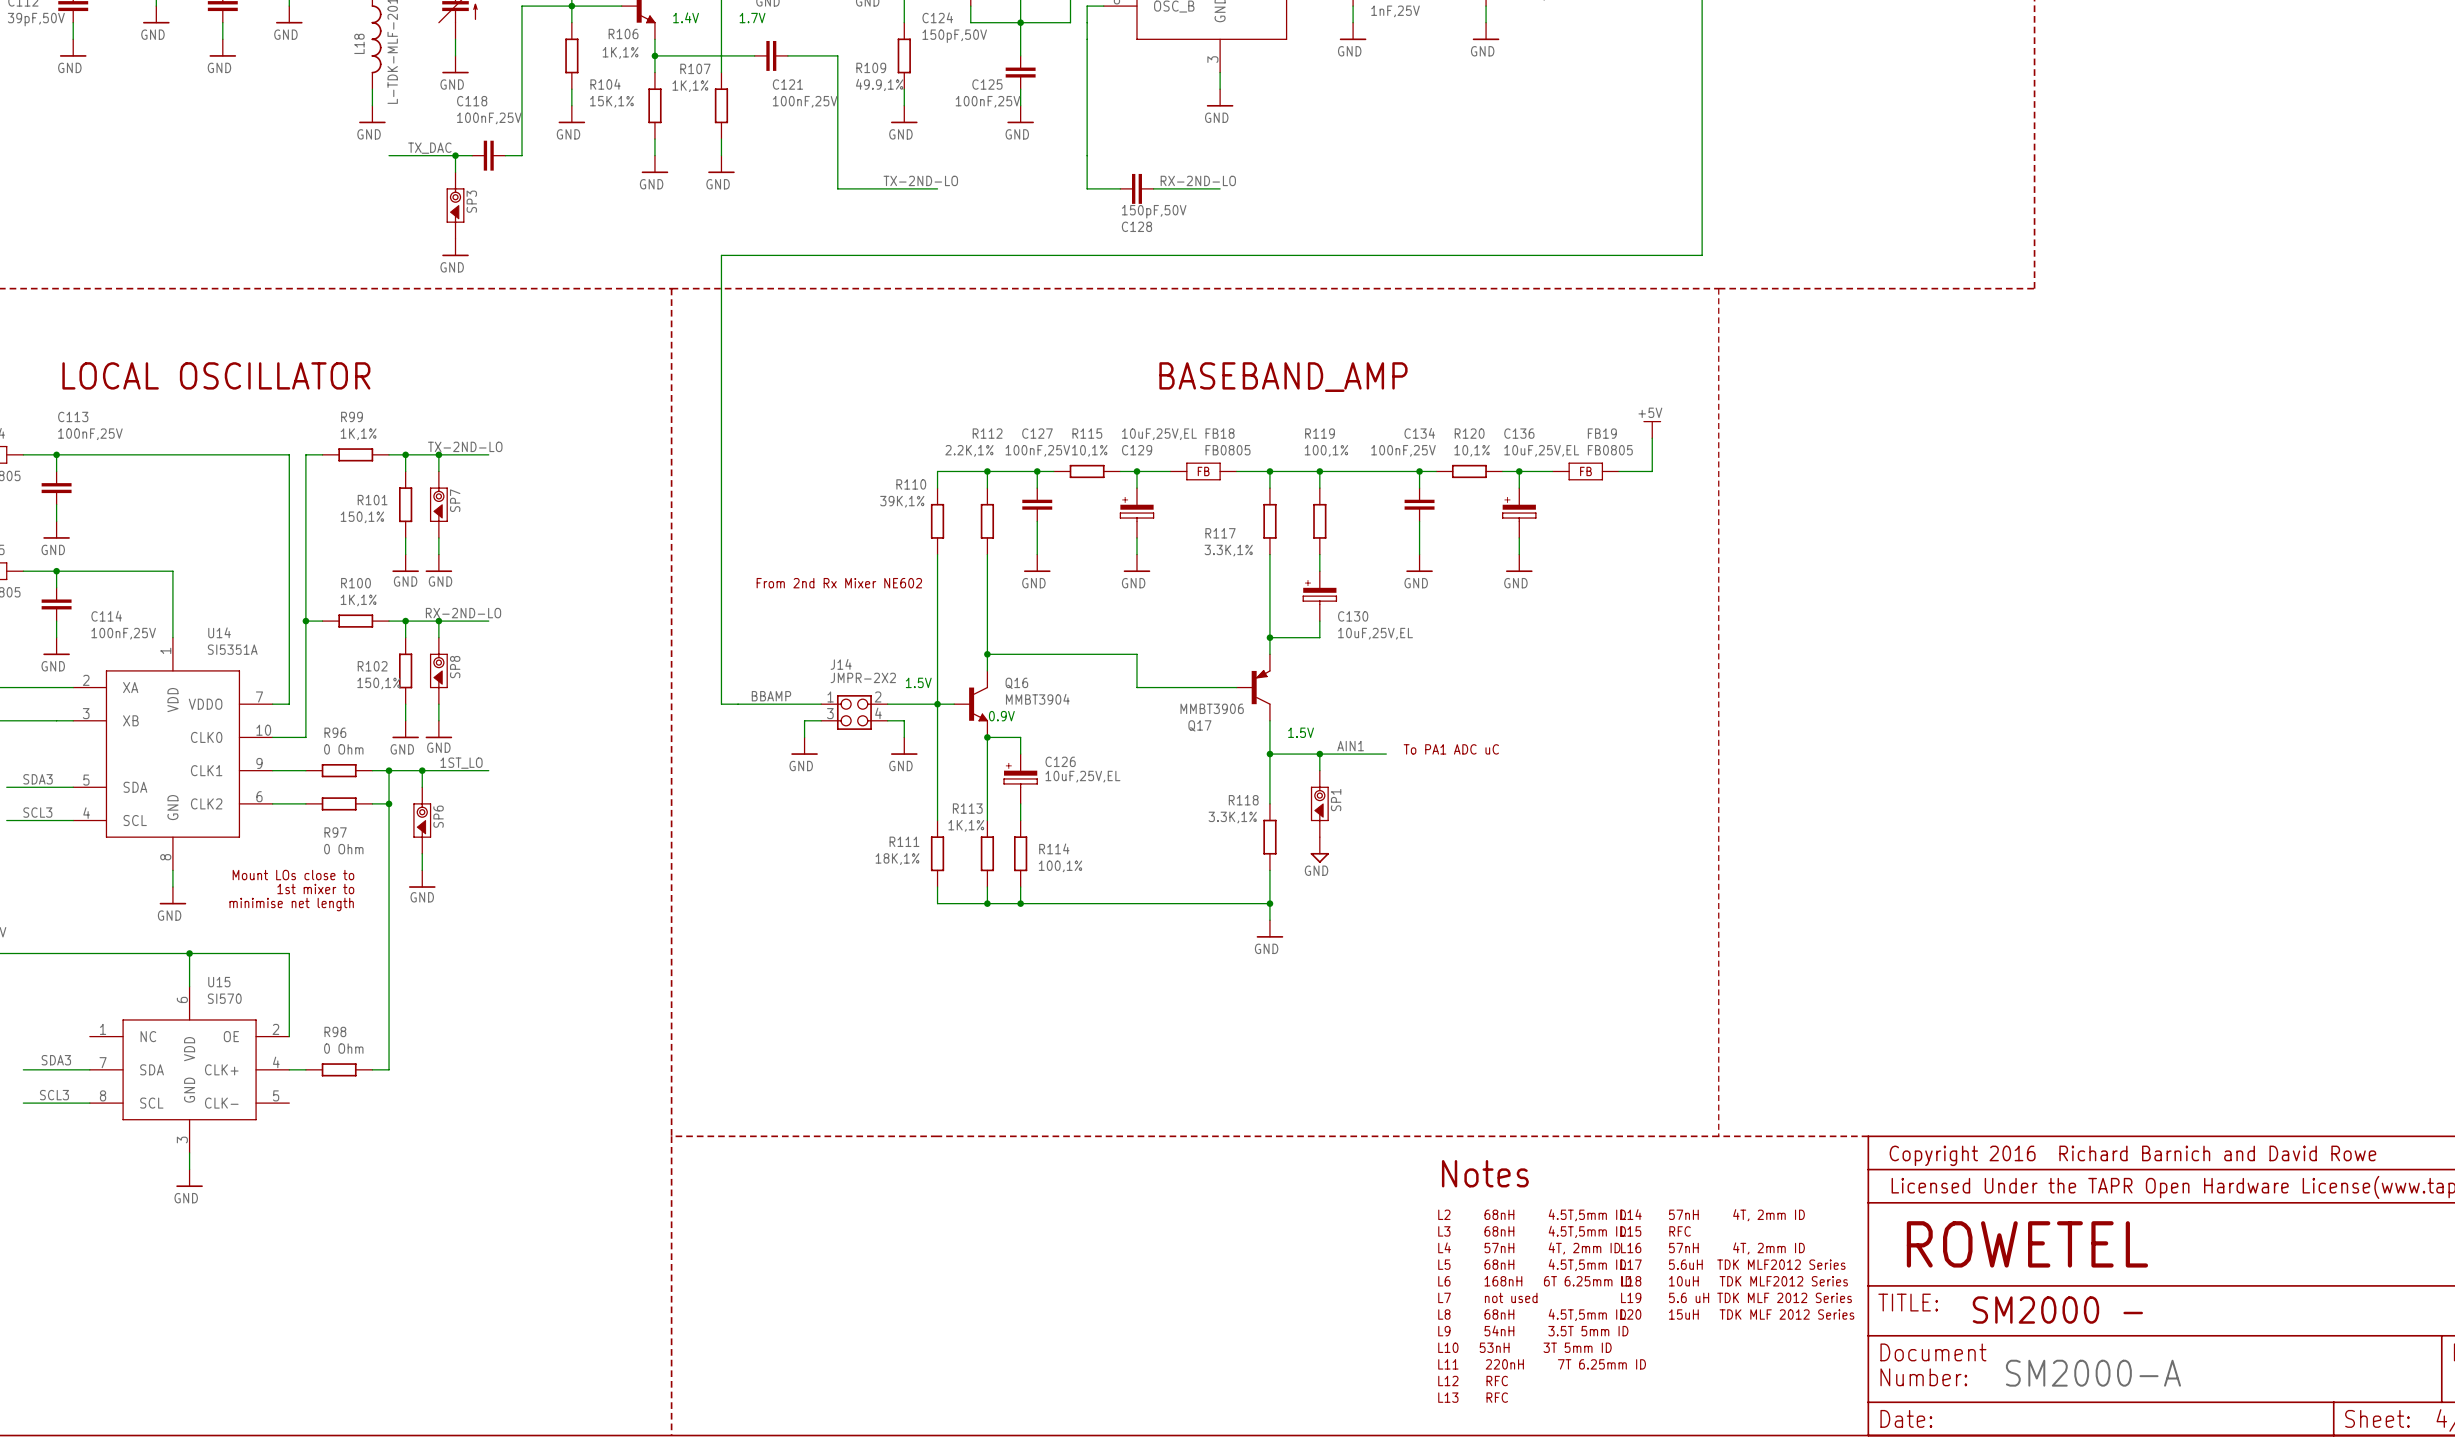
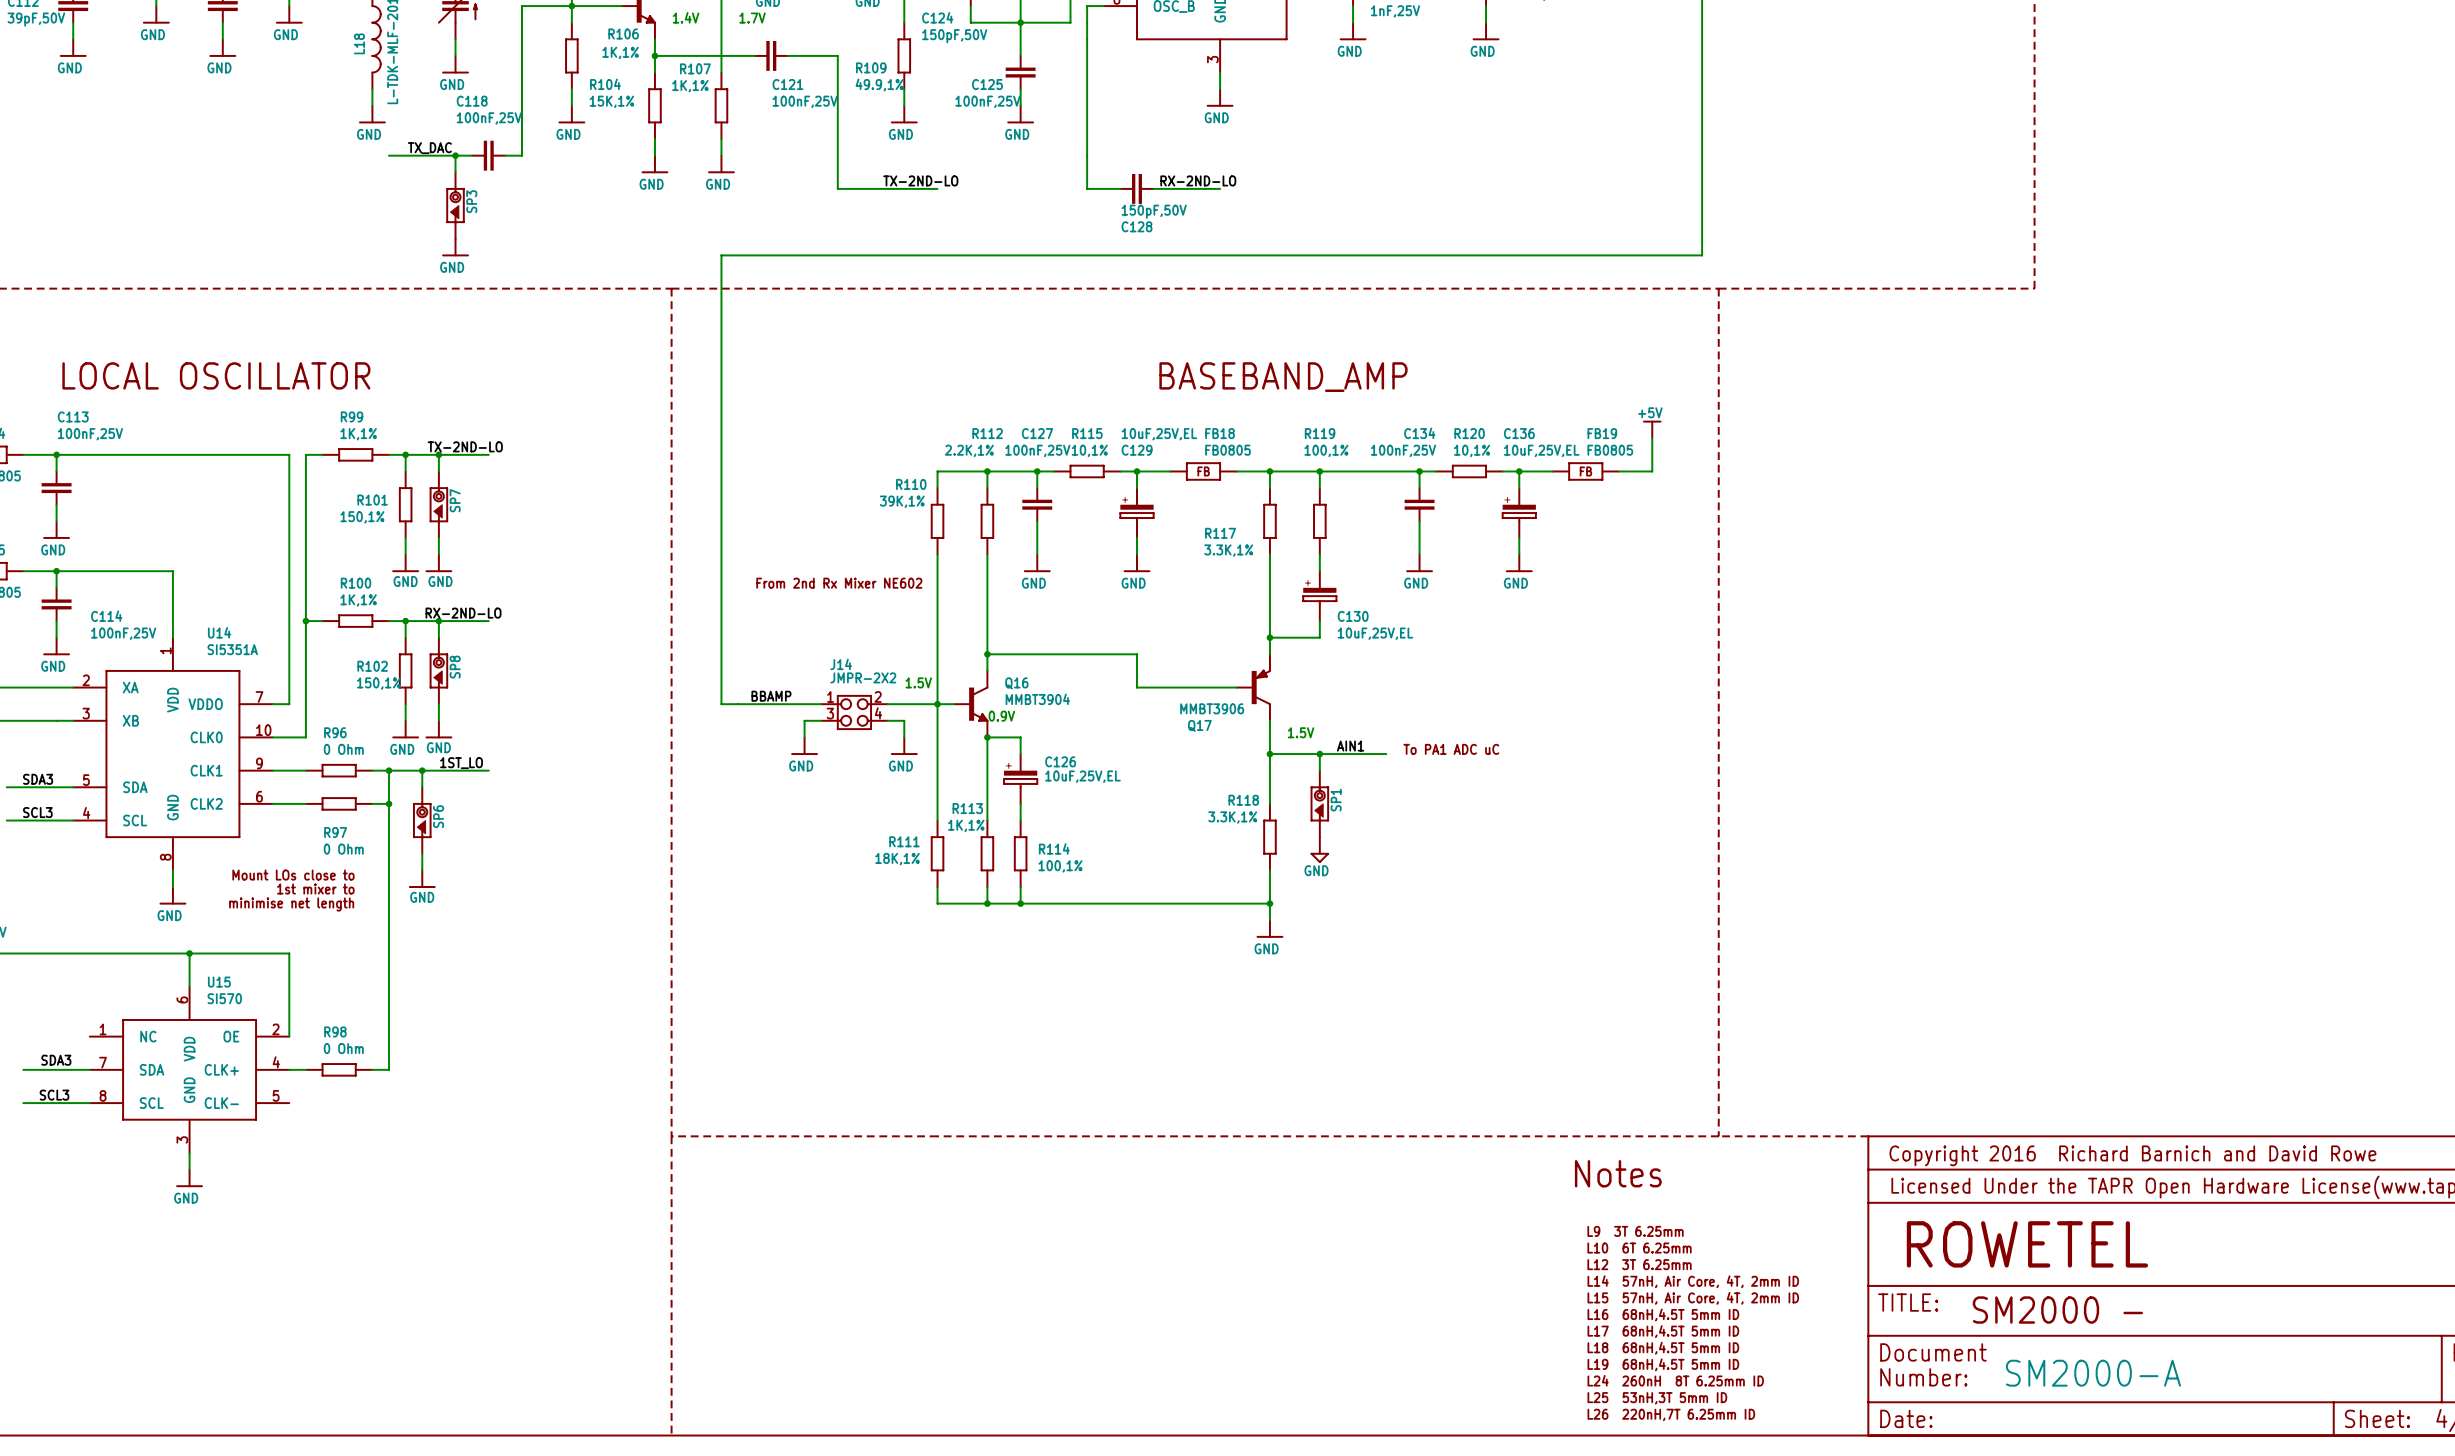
text position: Notes (1485, 1173) -> Notes (1618, 1173)
text: L2 68nH 4.5T,5mm ID (1532, 1215) -> none
text: L14 57nH 4T, 2mm ID (1712, 1215) -> none
text: L3 68nH 4.5T,5mm ID (1532, 1231) -> none
text: none -> L9 3T 6.25mm (1635, 1231)
text: L15 RFC (1655, 1231) -> none
text: L4 57nH 4T, 2mm ID (1529, 1248) -> none
text: none -> L10 6T 6.25mm (1639, 1248)
text: L16 57nH 4T, 2mm ID (1712, 1248) -> none
text: none -> L12 3T 6.25mm (1639, 1264)
text: L17 5.6uH TDK MLF2012 Series (1733, 1264) -> none
text: L5 68nH 4.5T,5mm ID (1532, 1265) -> none
text: L6 168nH 6T 6.25mm ID (1534, 1281) -> none
text: none -> L14 57nH, Air Core, 4T, 2mm ID (1693, 1281)
text: L18 10uH TDK MLF2012 Series (1734, 1281) -> none
text: L7 not used (1487, 1297) -> none
text: L19 5.6 uH TDK MLF 2012 Series (1736, 1297) -> none
text: none -> L15 57nH, Air Core, 4T, 2mm ID (1693, 1298)
text: L8 68nH 4.5T,5mm ID (1532, 1314) -> none
text: none -> L16 68nH,4.5T 5mm ID (1663, 1314)
text: L20 15uH TDK MLF 2012 Series (1737, 1314) -> none
text: L9 54nH 3.5T 5mm ID (1533, 1330) -> none
text: none -> L17 68nH,4.5T 5mm ID (1663, 1331)
text: L10 53nH 3T 5mm ID (1524, 1347) -> none
text: none -> L18 68nH,4.5T 5mm ID (1663, 1348)
text: L11 220nH 7T 6.25mm ID (1542, 1364) -> L24 260nH 8T 6.25mm ID (1675, 1380)
text: none -> L19 68nH,4.5T 5mm ID (1663, 1364)
text: L12 RFC (1473, 1381) -> none
text: L13 RFC (1473, 1397) -> none
text: none -> L25 53nH,3T 5mm ID (1657, 1398)
text: none -> L26 220nH,7T 6.25mm ID (1671, 1414)

